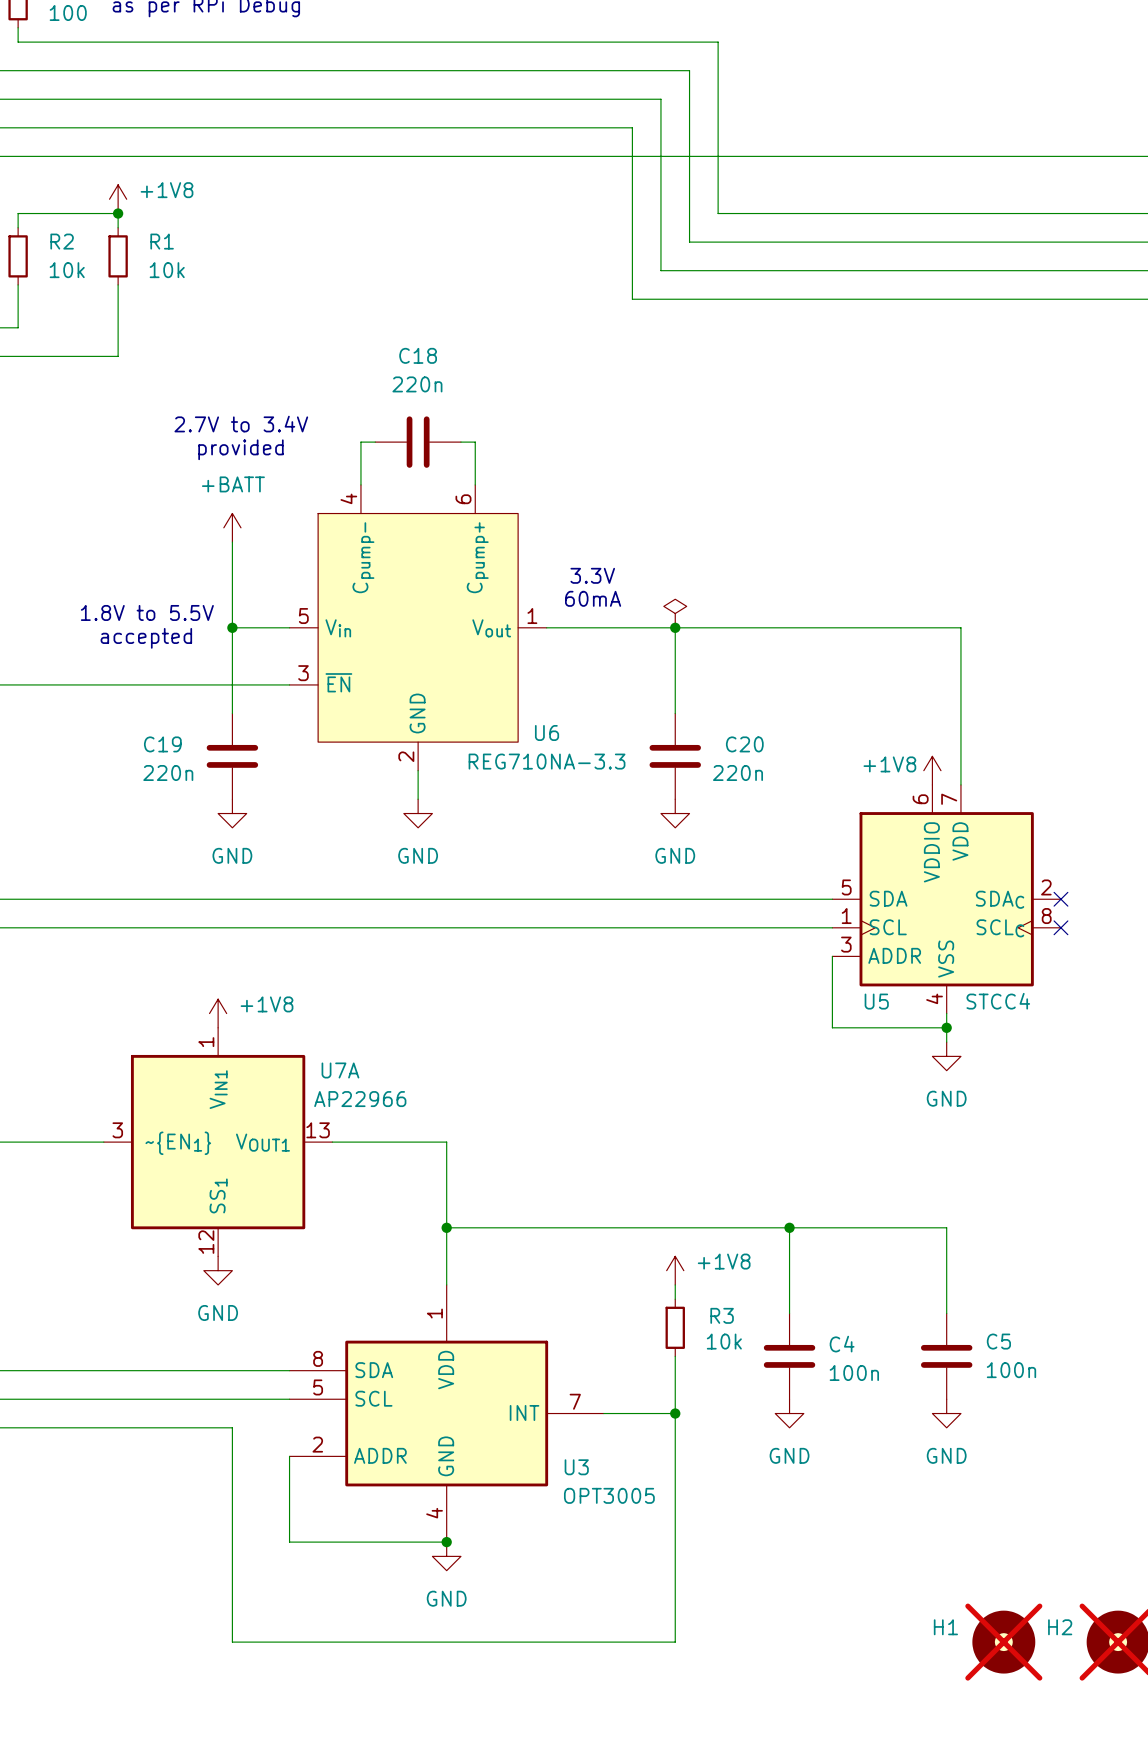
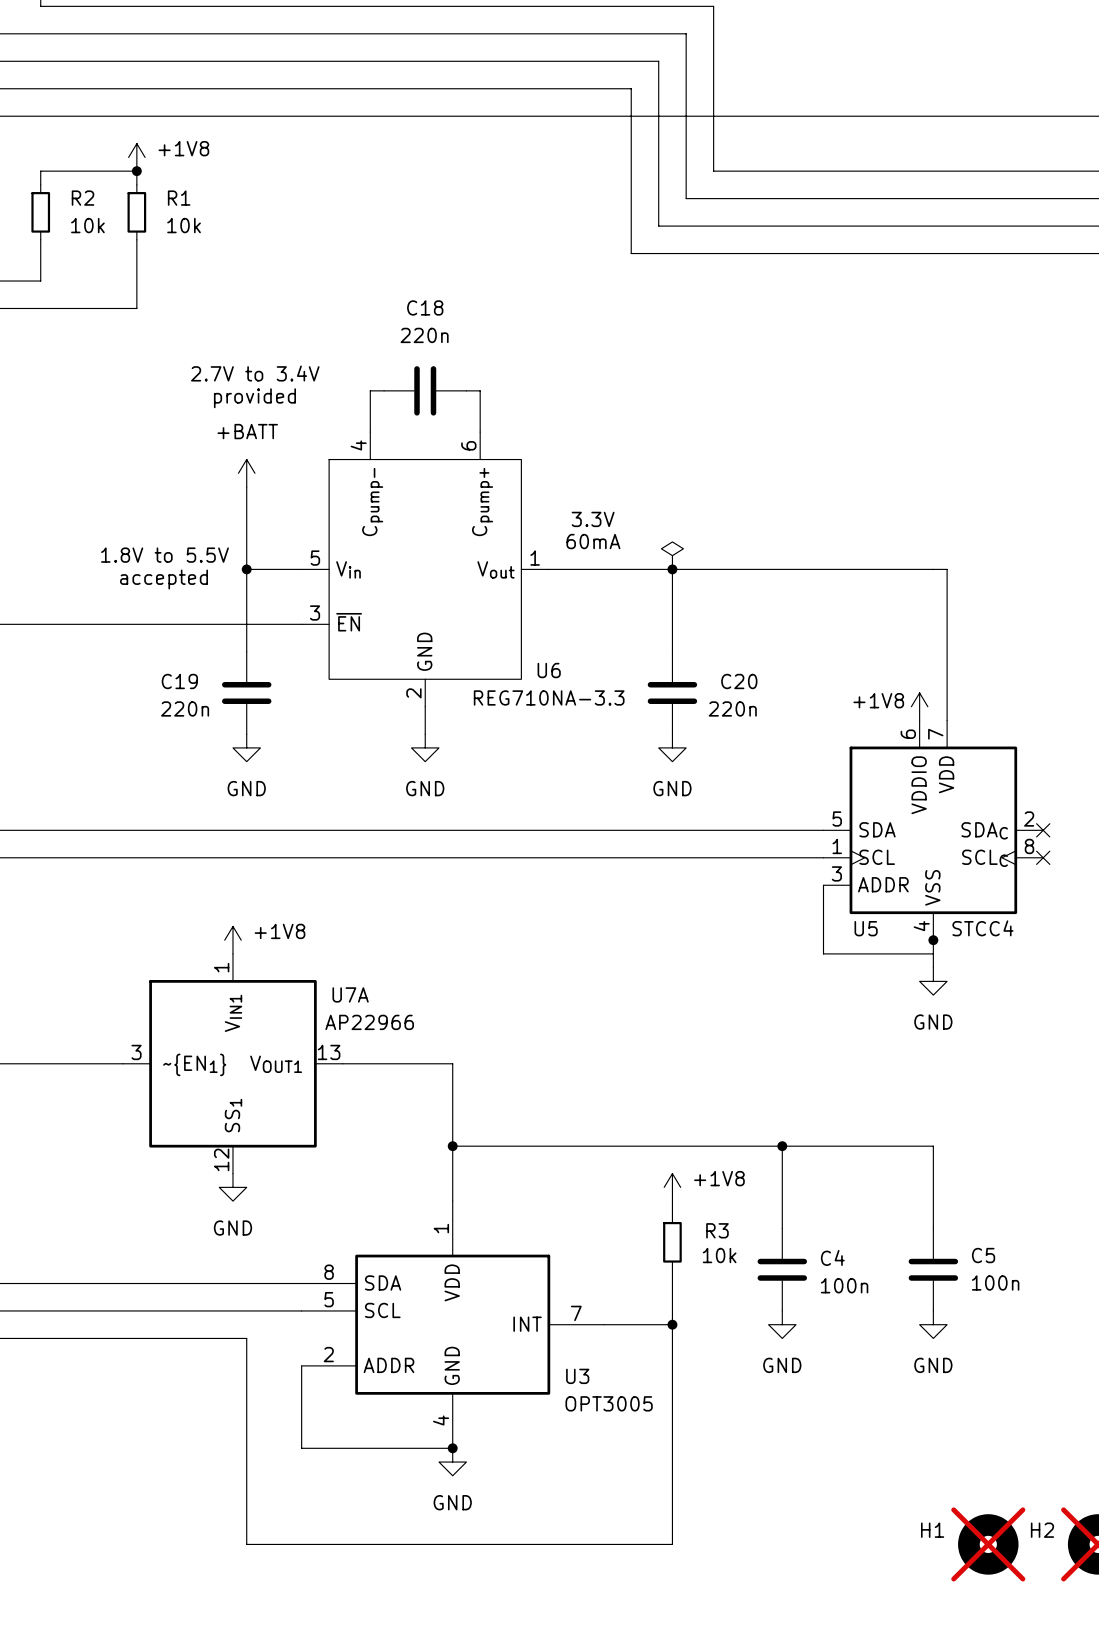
junction position: (946, 1027) -> (933, 940)

